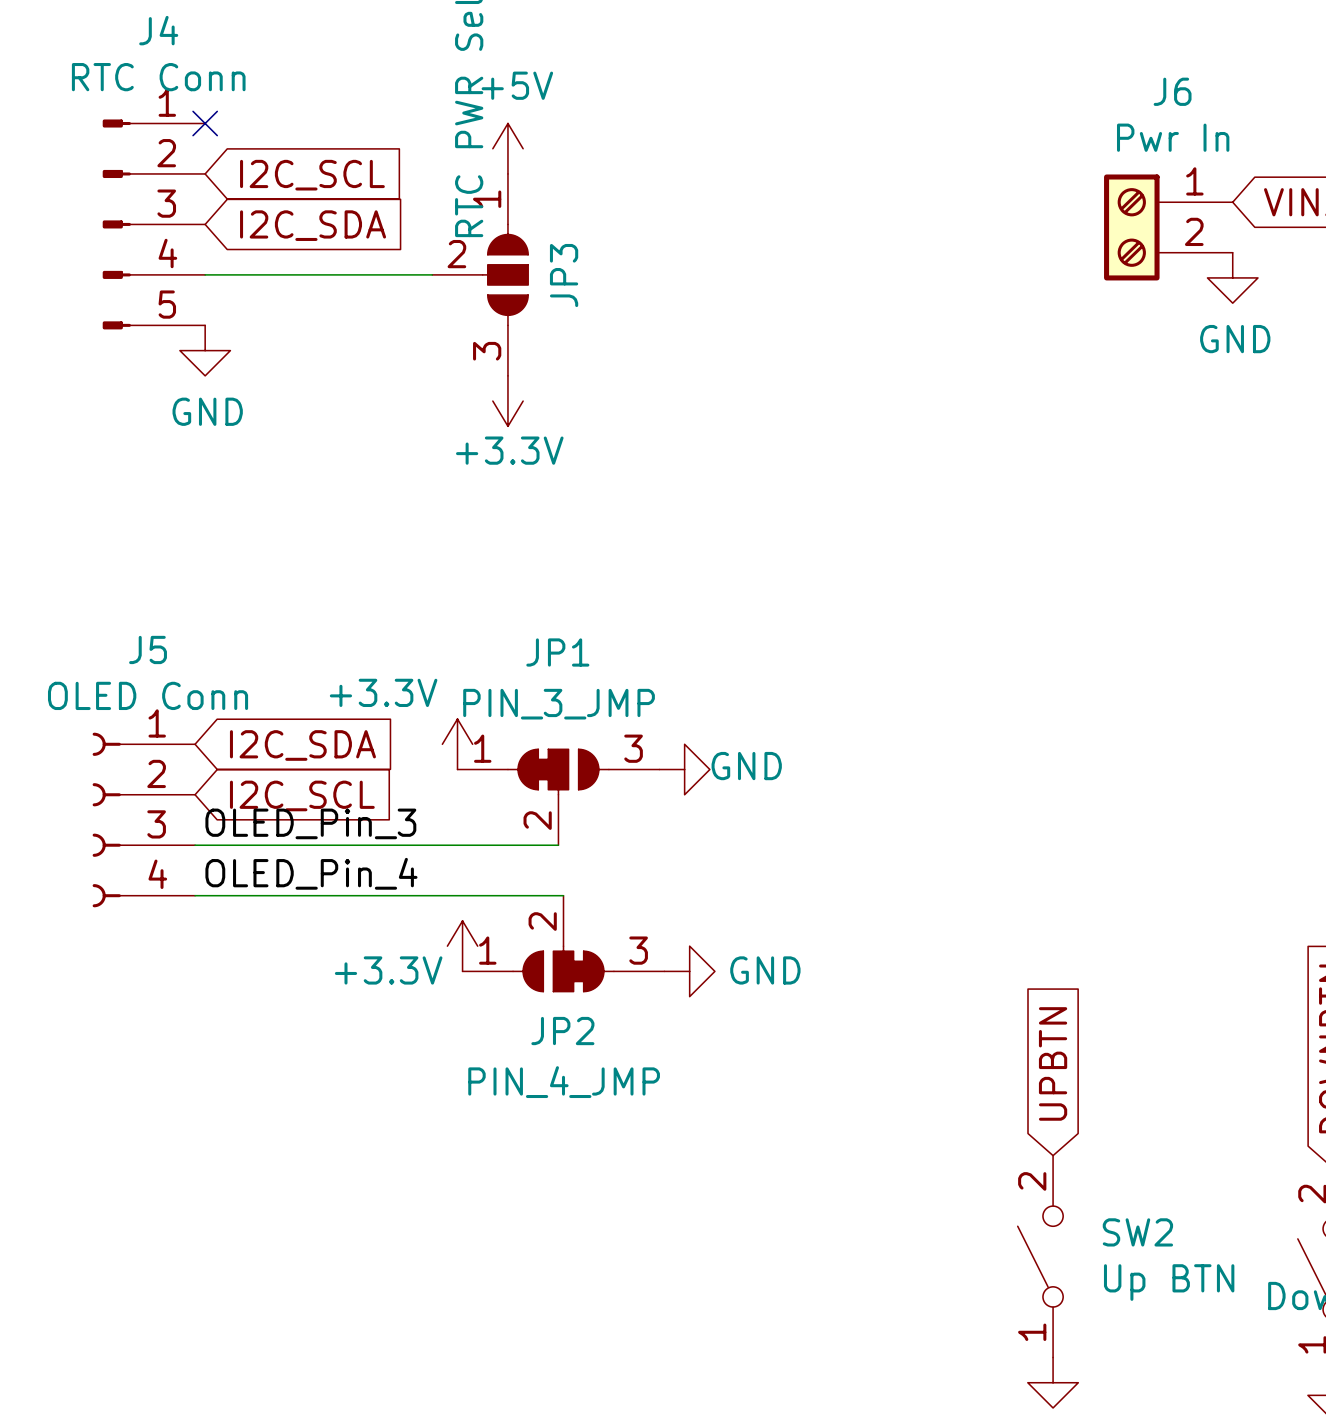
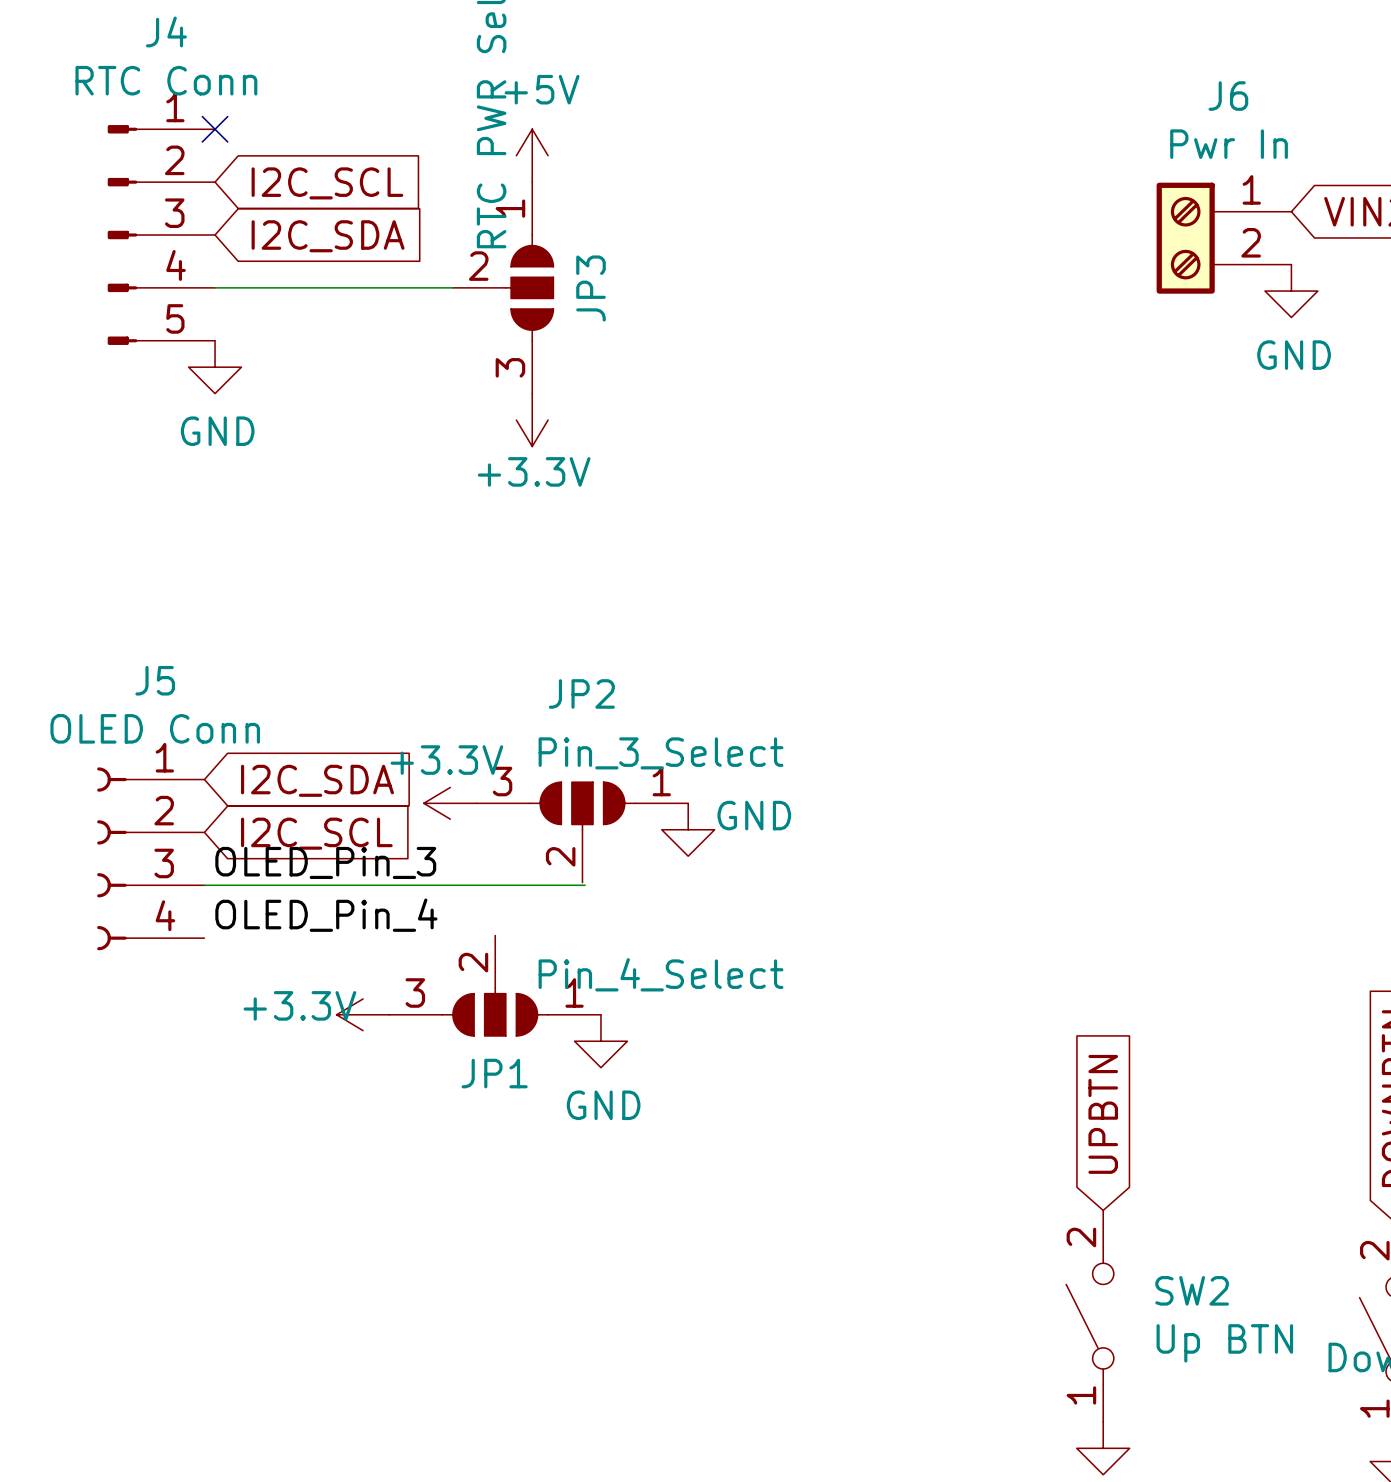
JP1 name position: JP1 (557, 652) -> JP1 (494, 1073)
power symbol text position: +3.3V (383, 692) -> +3.3V (446, 760)
JP1 value: PIN_3_JMP (559, 704) -> Pin_4_Select (661, 974)
power symbol rotation: 0° (457, 744) -> 90° counterclockwise (450, 803)
power symbol position: +3.3V (457, 744) -> +3.3V (450, 803)
JP1 symbol: [457, 749, 660, 846] -> [389, 935, 601, 1036]
power symbol rotation: 0° (684, 769) -> 90° clockwise (688, 829)
power symbol position: GND (684, 769) -> GND (688, 829)
wire: (195, 895) (563, 895) -> none
JP2 symbol: [462, 895, 665, 992] -> [476, 782, 689, 883]
power symbol: +3.3V (462, 946) -> none
power symbol: none -> +3.3V (363, 1014)
power symbol: GND (689, 971) -> none
power symbol: none -> GND (600, 1041)
JP2 name position: JP2 (562, 1031) -> JP2 (581, 693)
JP2 value: PIN_4_JMP (564, 1082) -> Pin_3_Select (661, 753)

